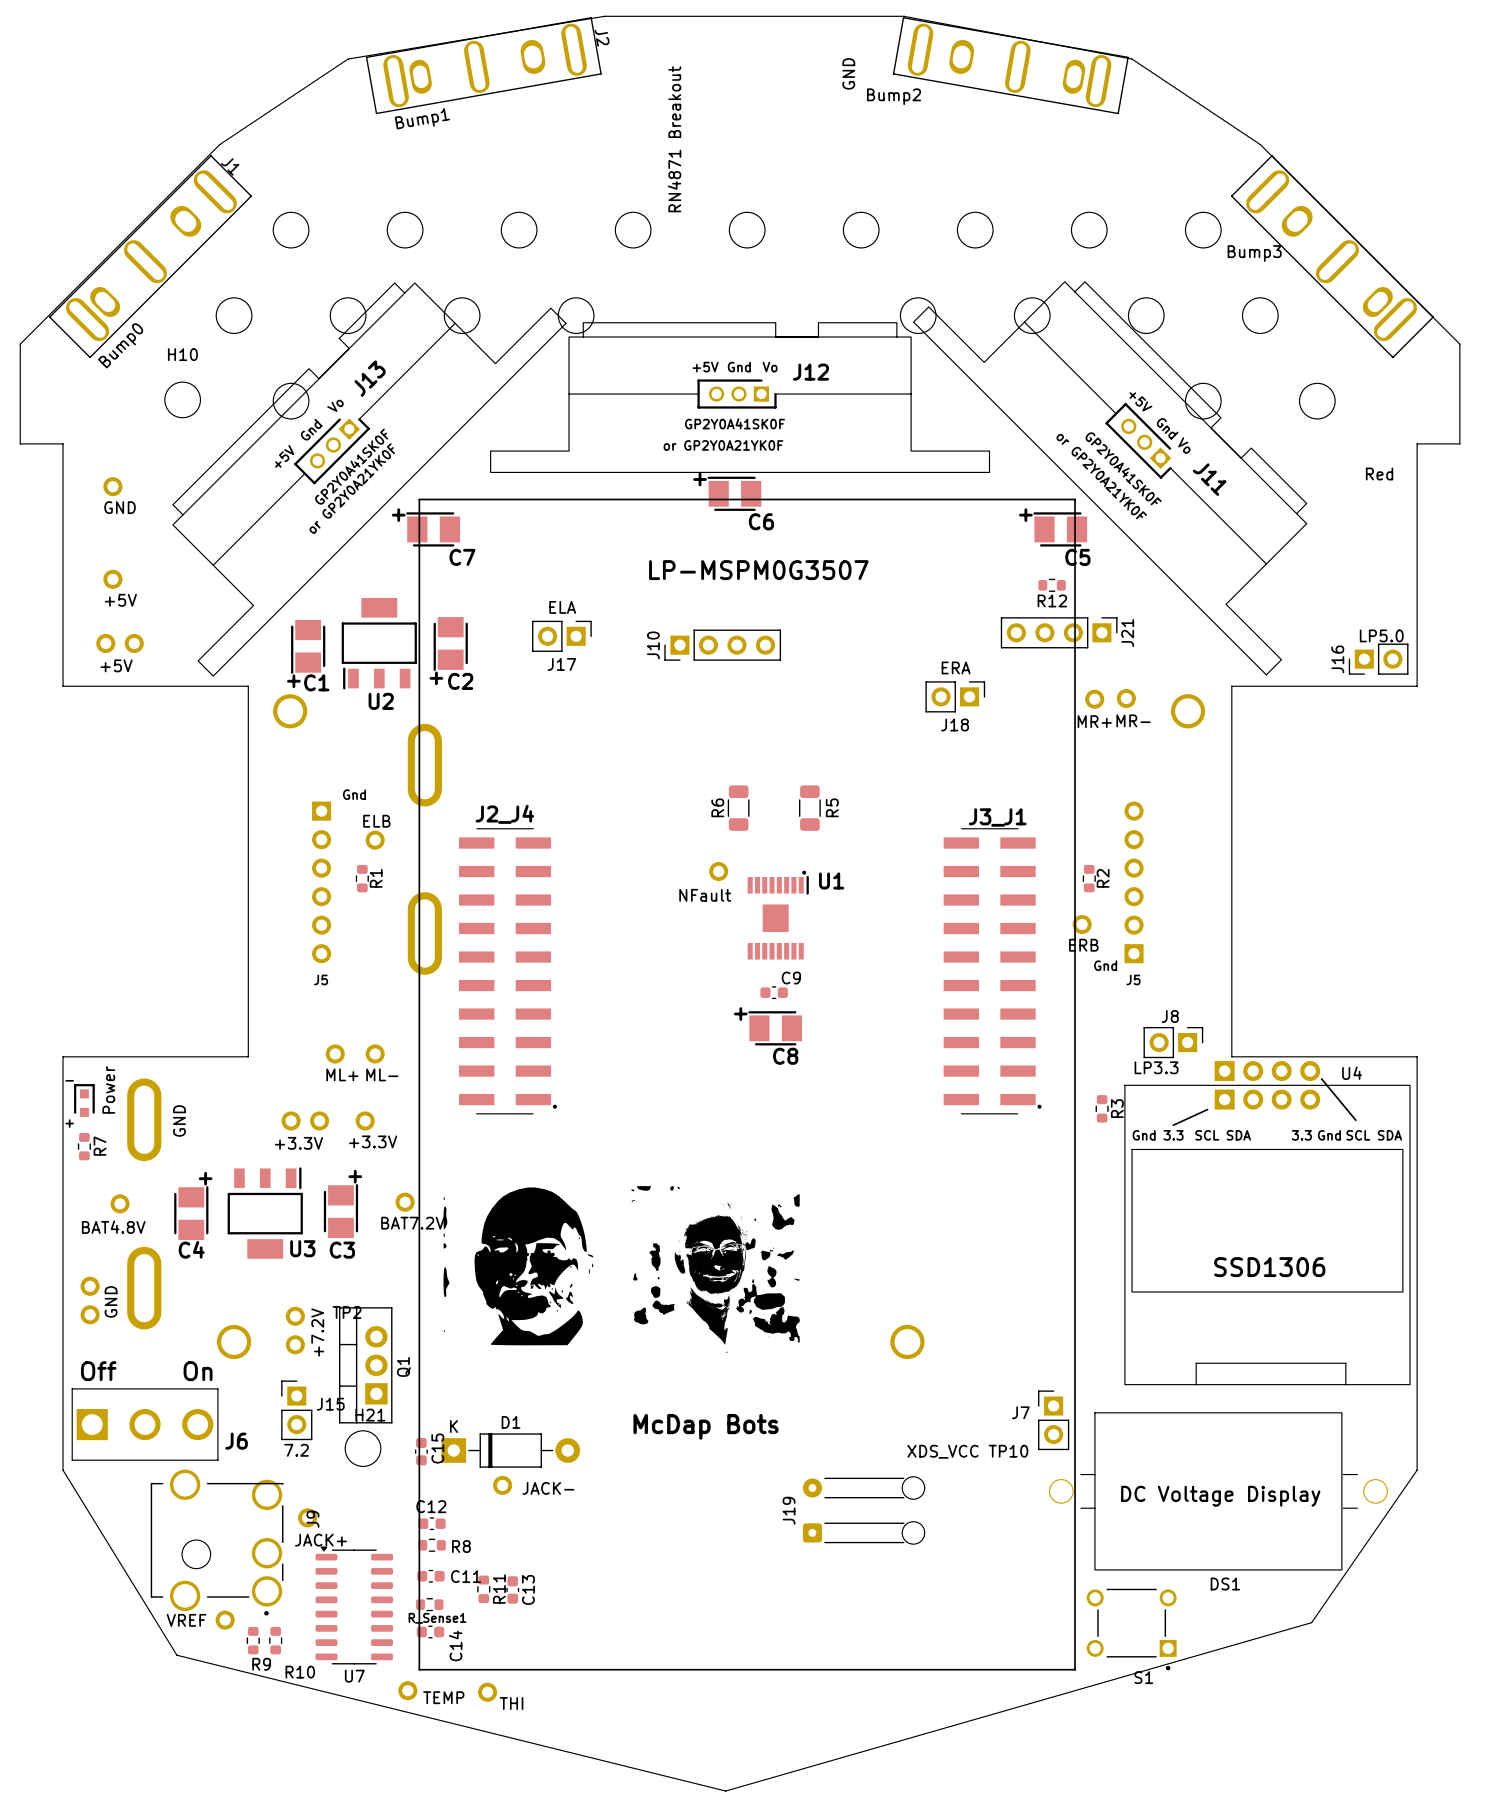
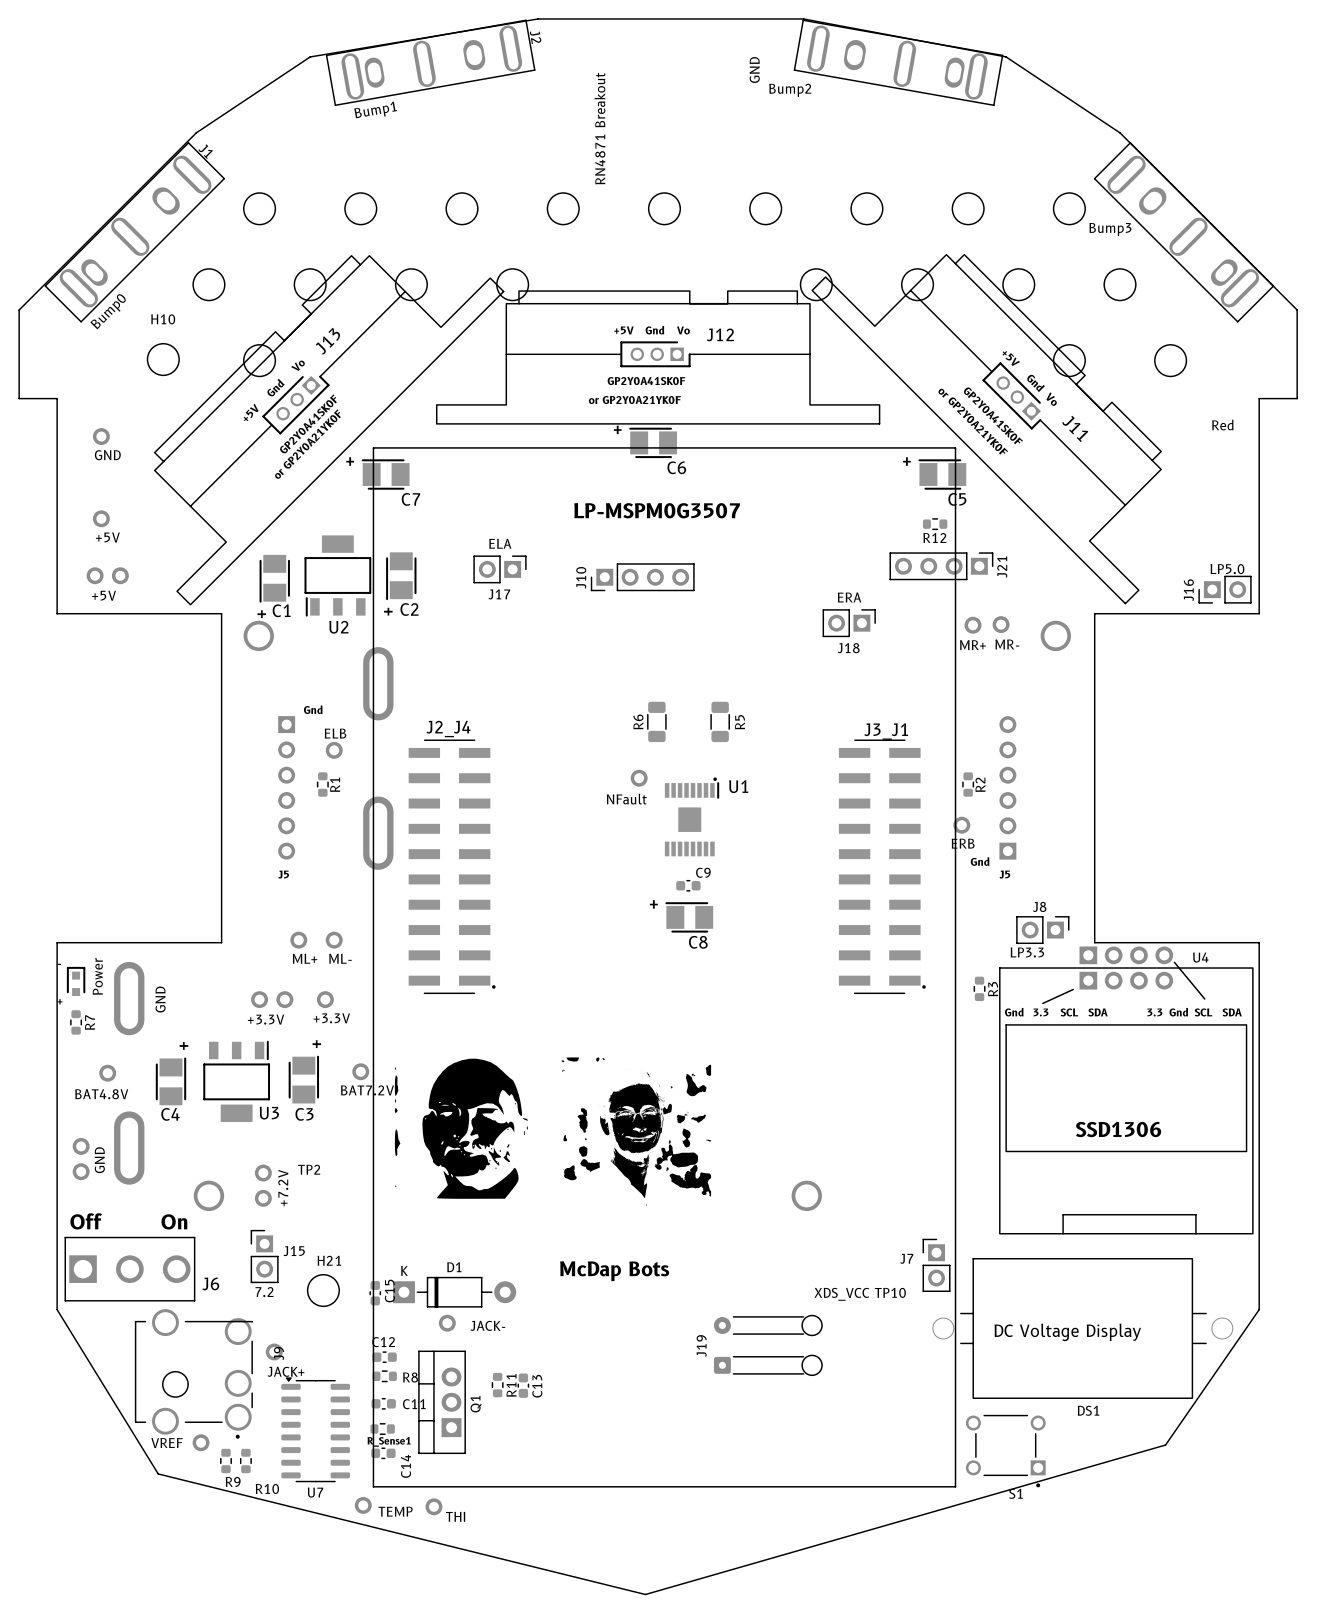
Q1 position: (365, 1365) -> (442, 1402)
R11 position: (483, 1589) -> (497, 1385)
C13 position: (512, 1589) -> (523, 1385)

